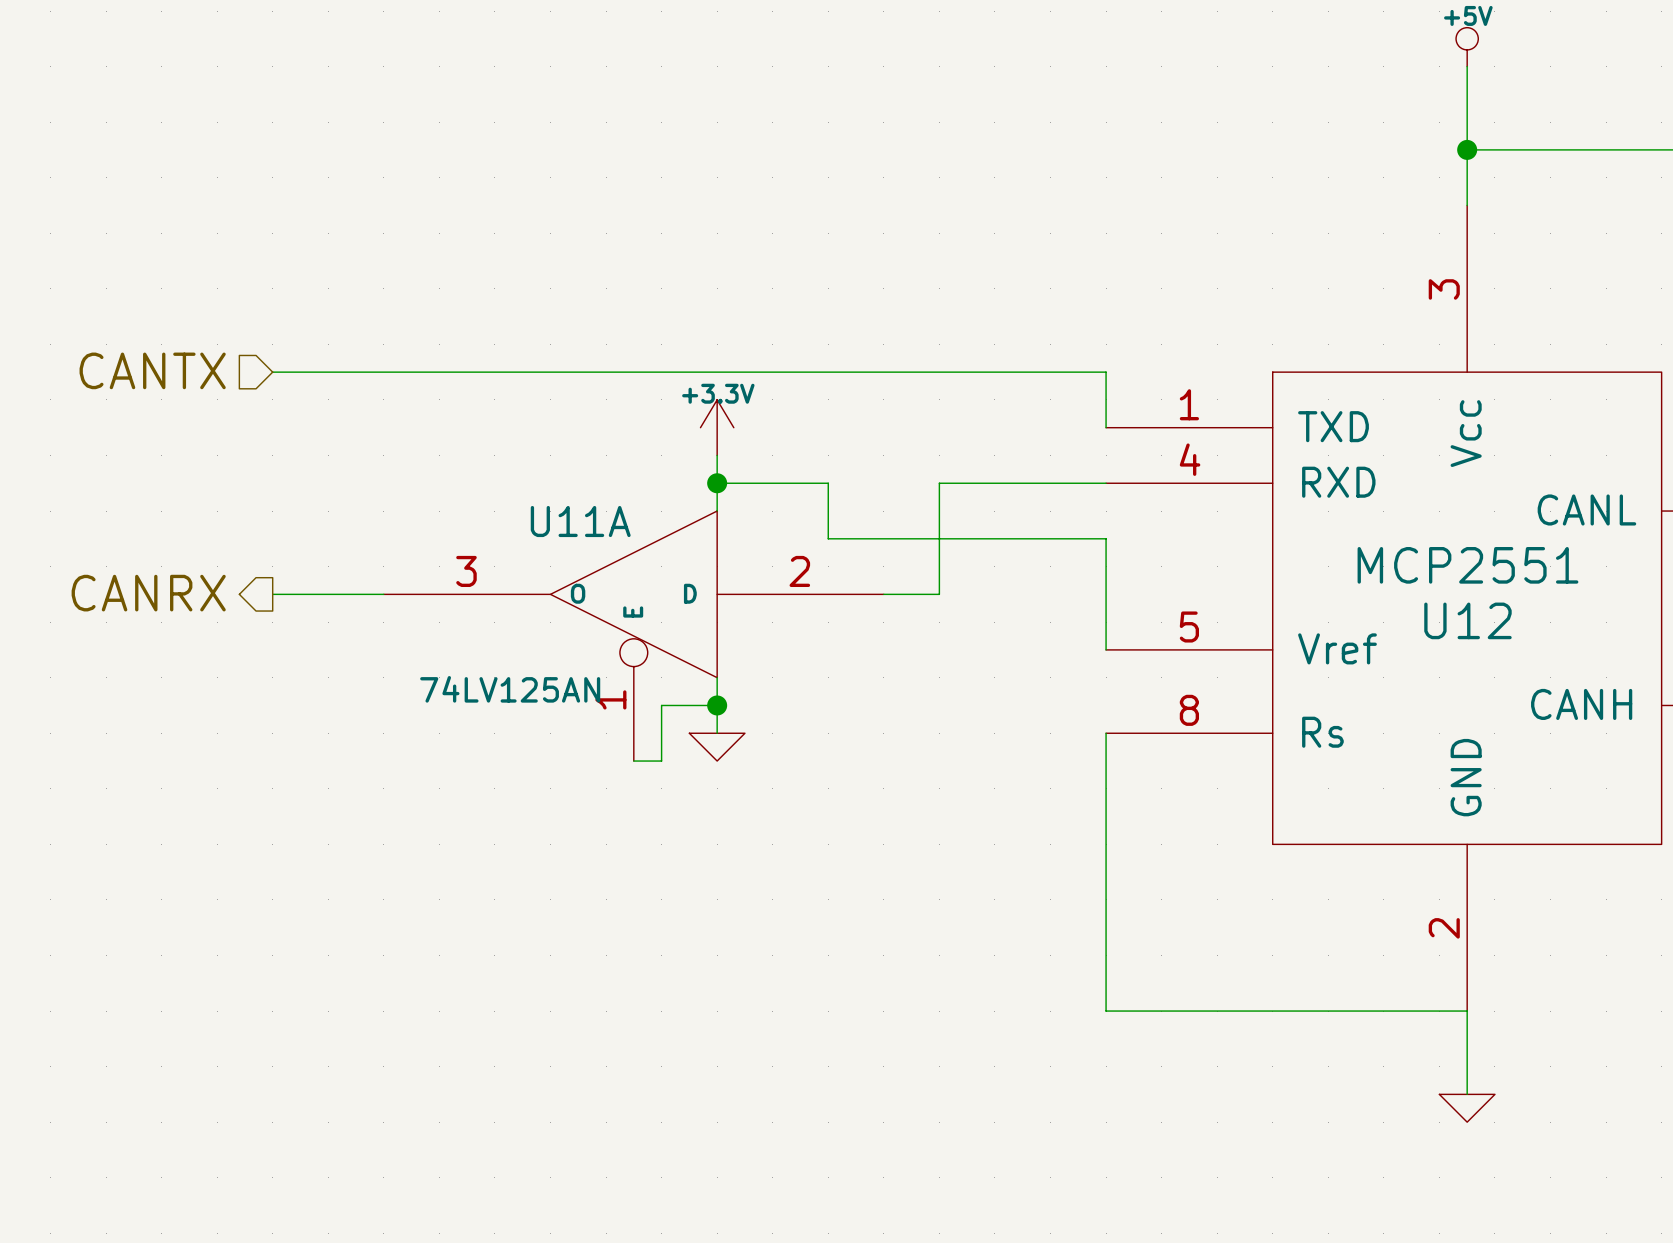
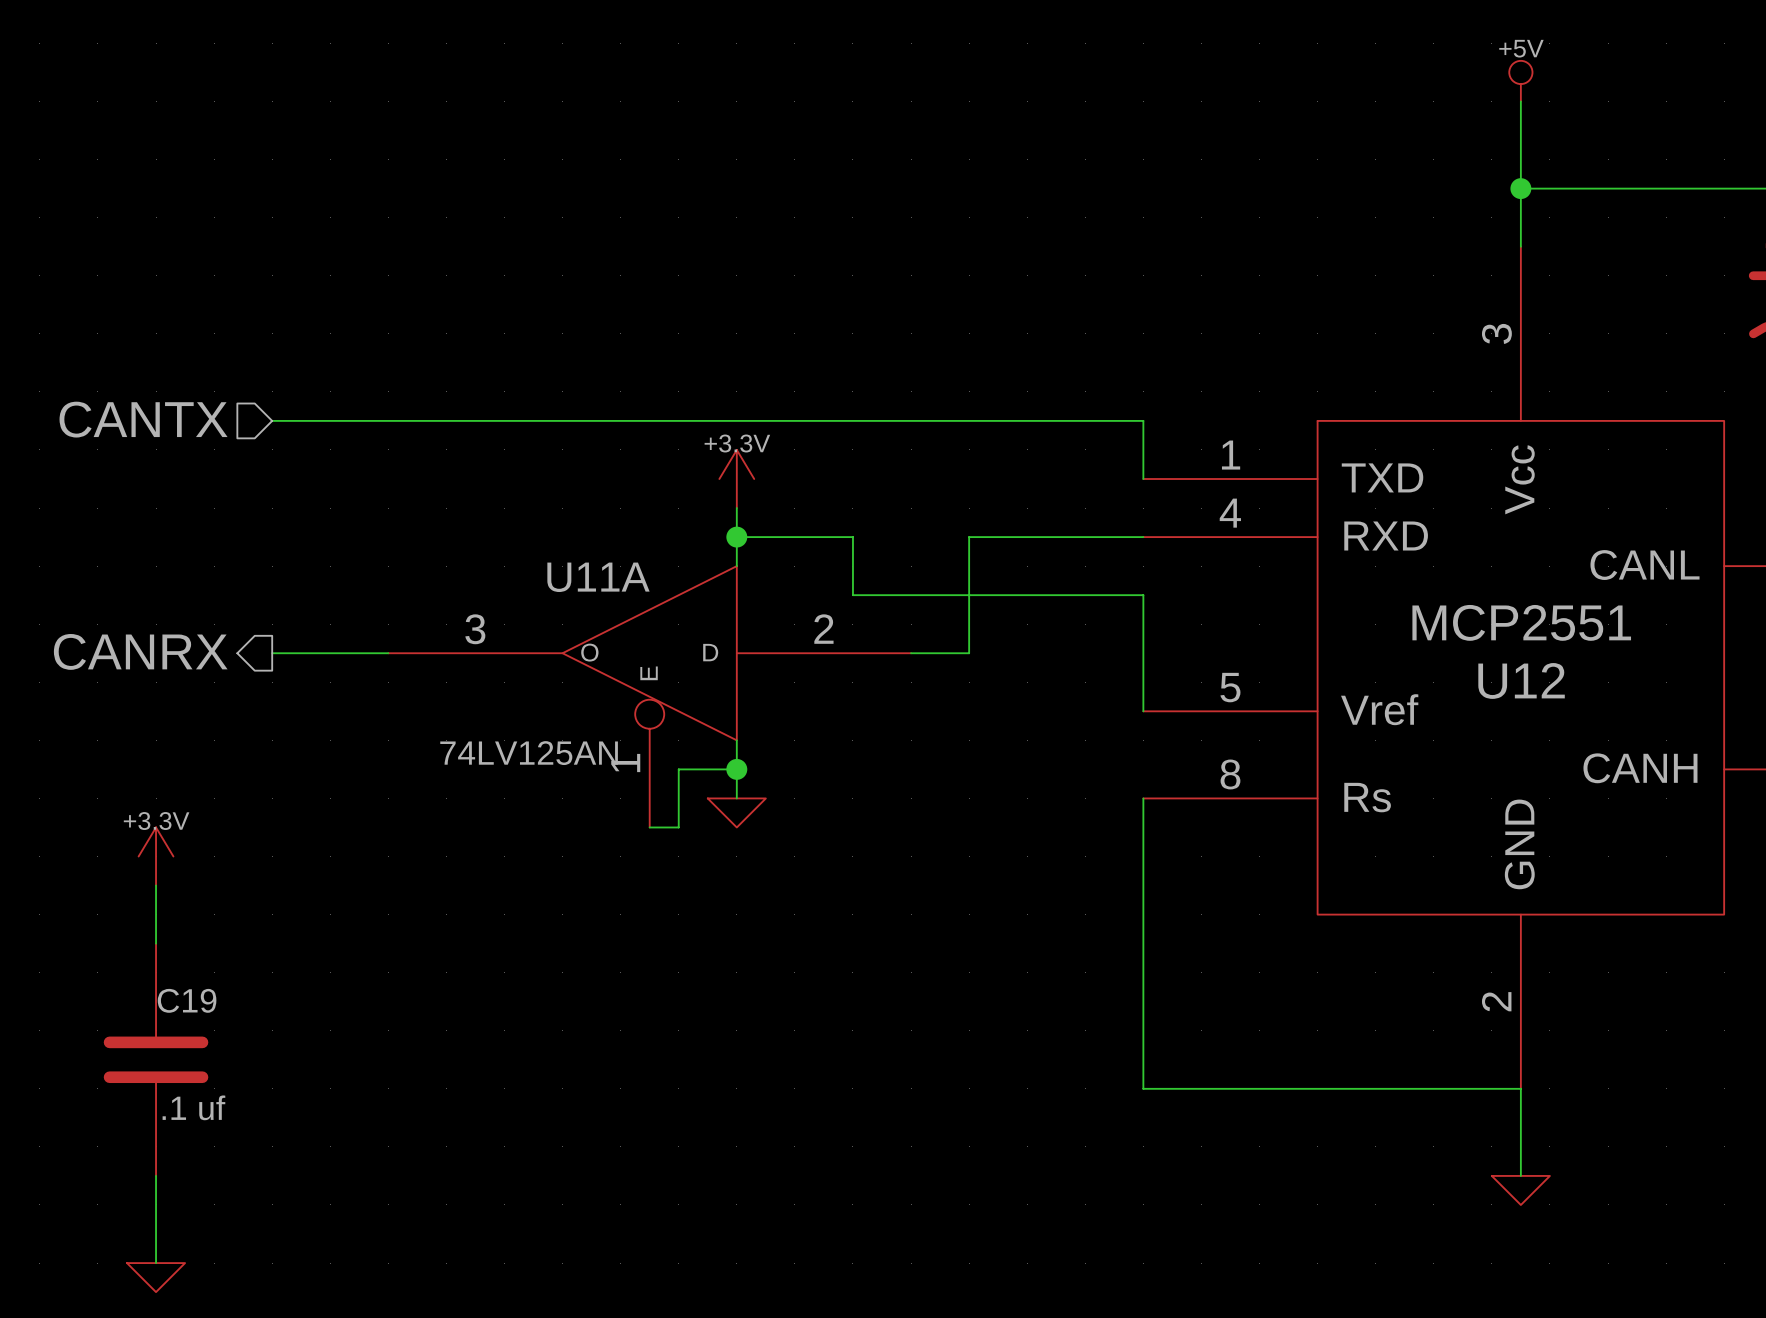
power symbol: none -> +3.3V (156, 856)
wire: none -> (156, 885) (156, 943)
C19: none -> .1 uf (156, 1059)
wire: none -> (156, 1175) (156, 1263)
power symbol: none -> (156, 1277)

